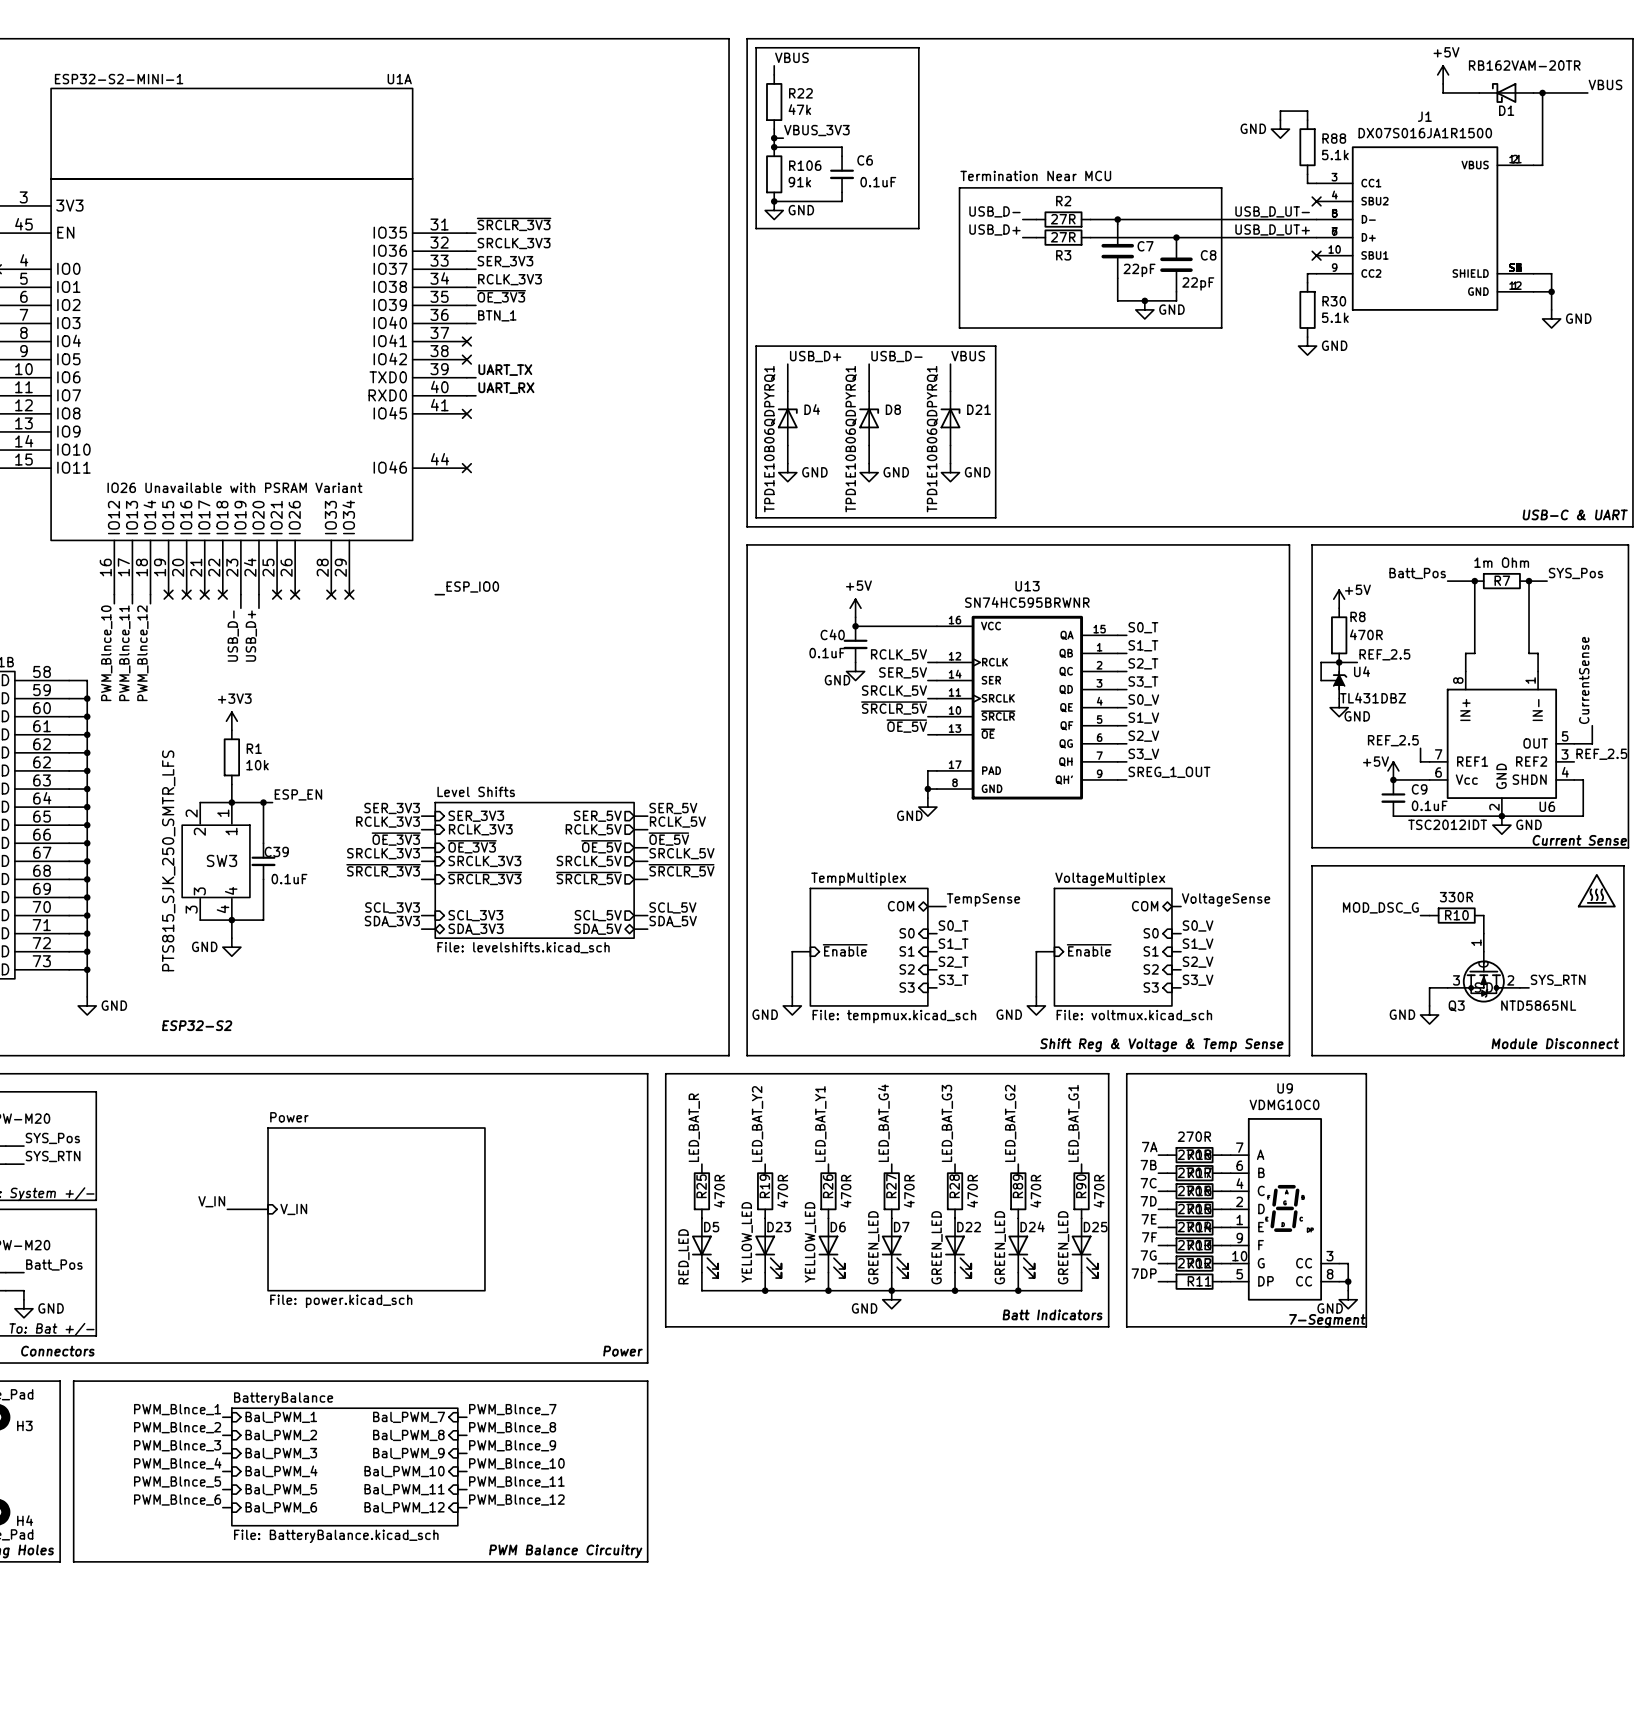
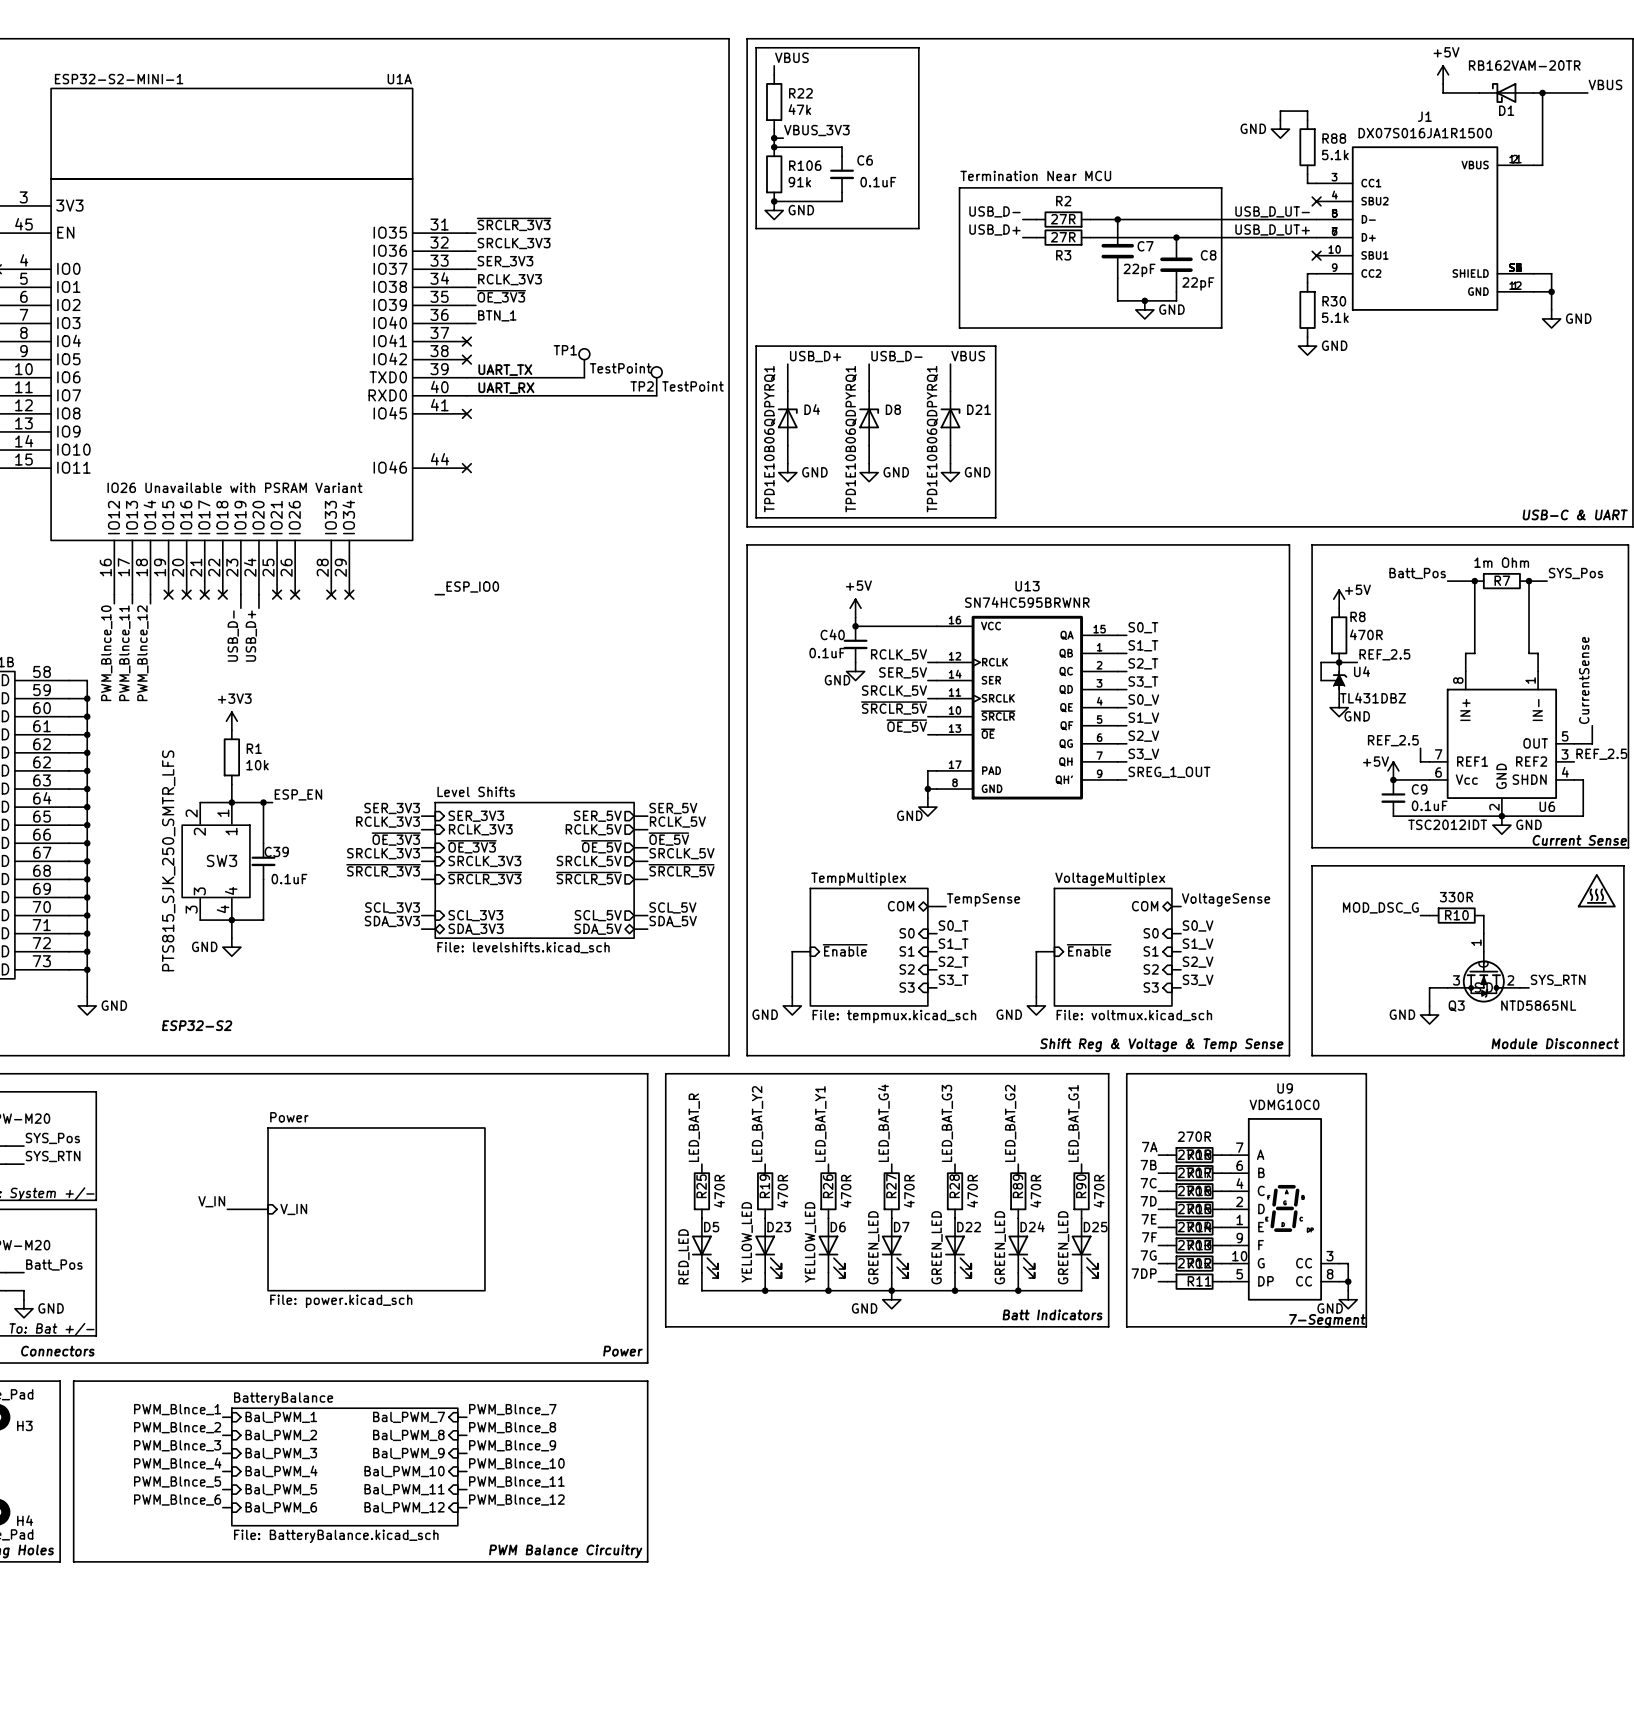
TP1: none -> TestPoint (584, 363)
wire: none -> (475, 377) (584, 377)
TP2: none -> TestPoint (656, 381)
wire: none -> (475, 395) (656, 395)

